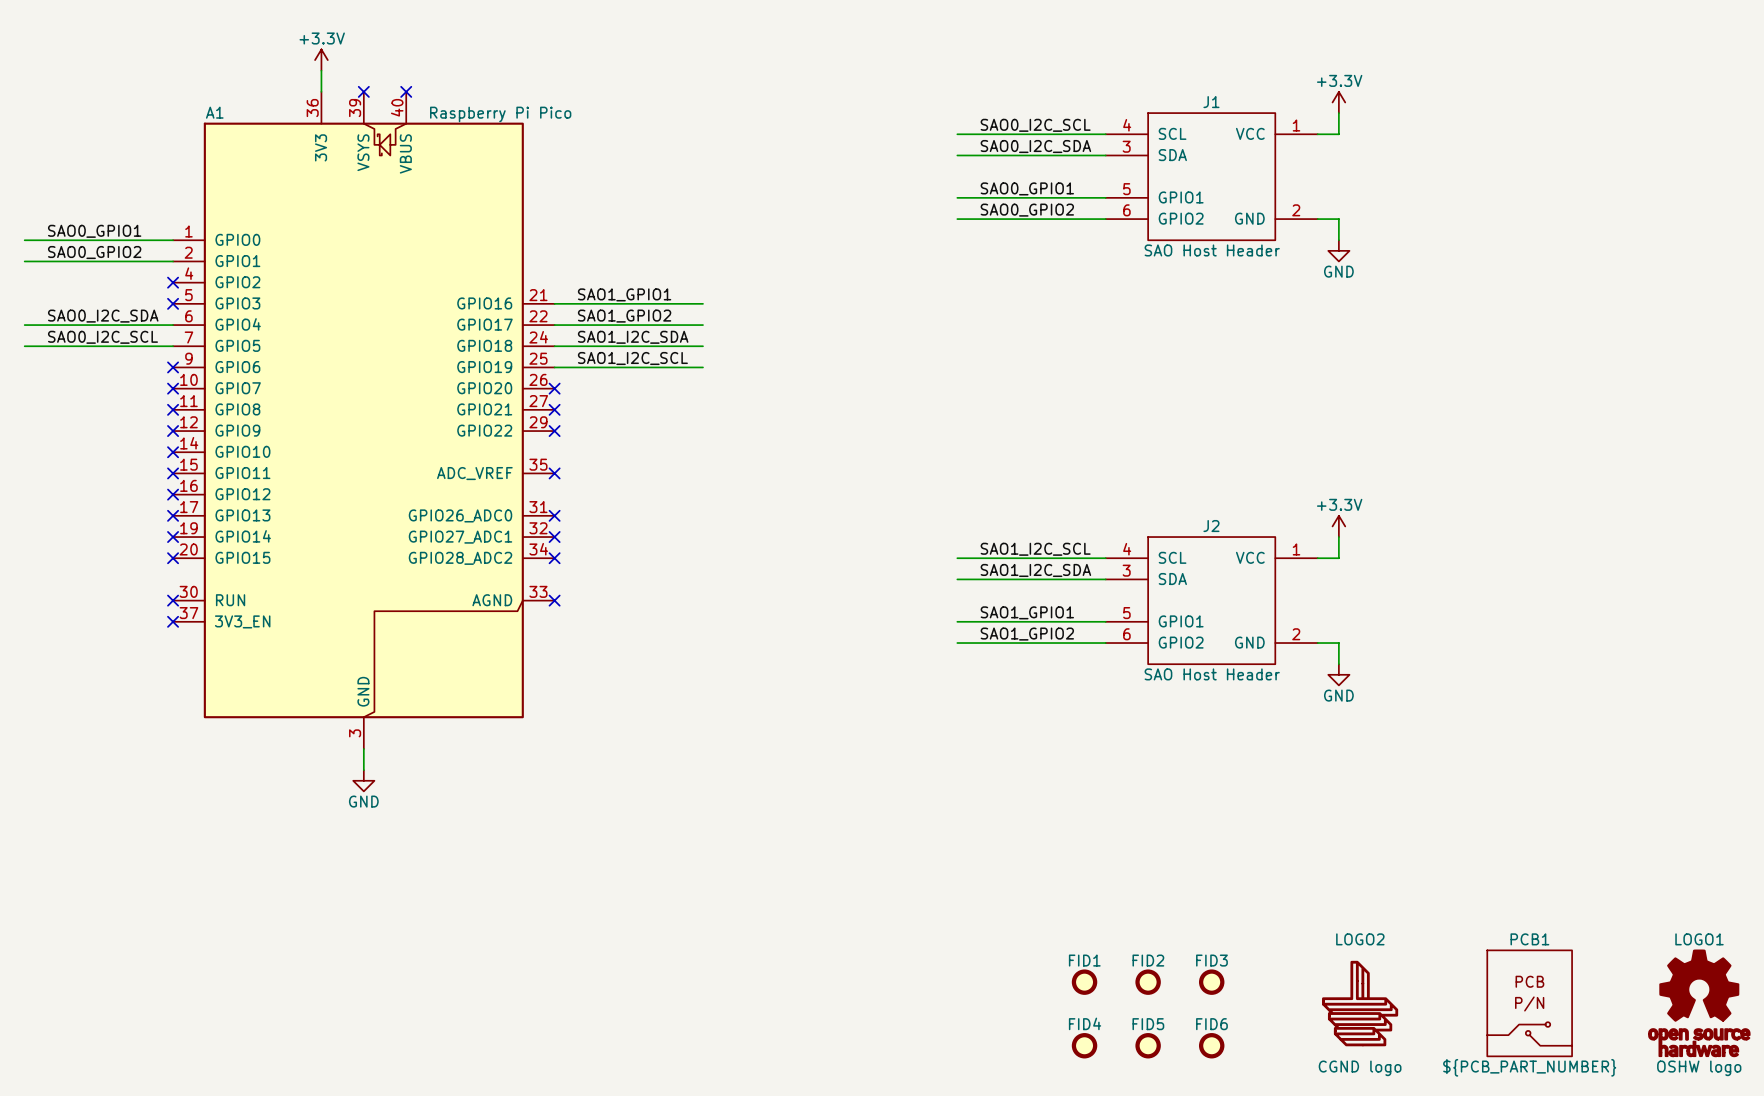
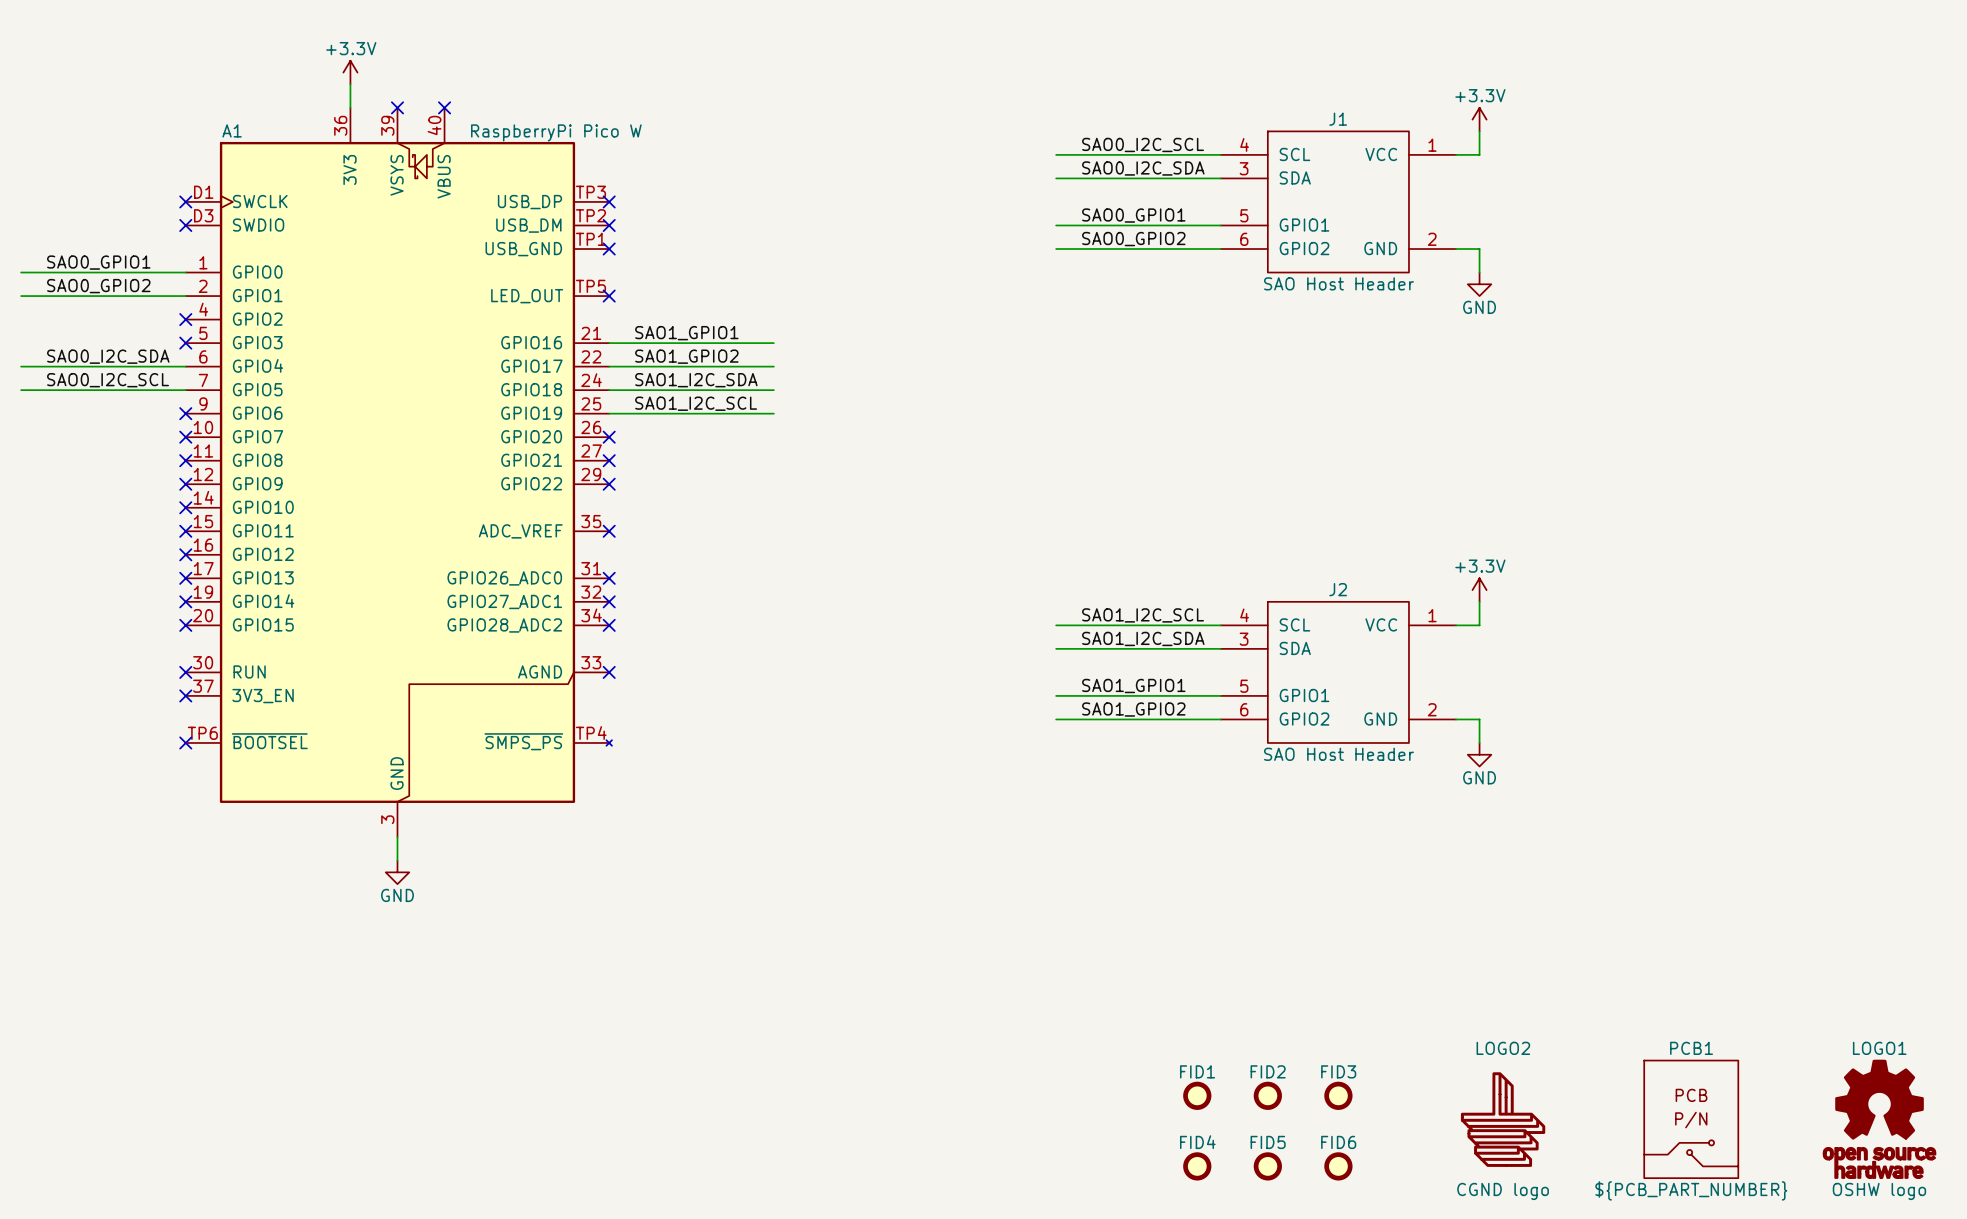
A1 symbol: [173, 91, 555, 749] -> [185, 107, 612, 838]
A1 value: Raspberry Pi Pico (500, 114) -> RaspberryPi Pico W (556, 132)
no-connect mark: none -> (185, 201)
no-connect mark: none -> (609, 201)
no-connect mark: none -> (185, 225)
no-connect mark: none -> (609, 225)
no-connect mark: none -> (609, 249)
no-connect mark: none -> (609, 296)
no-connect mark: none -> (185, 742)

